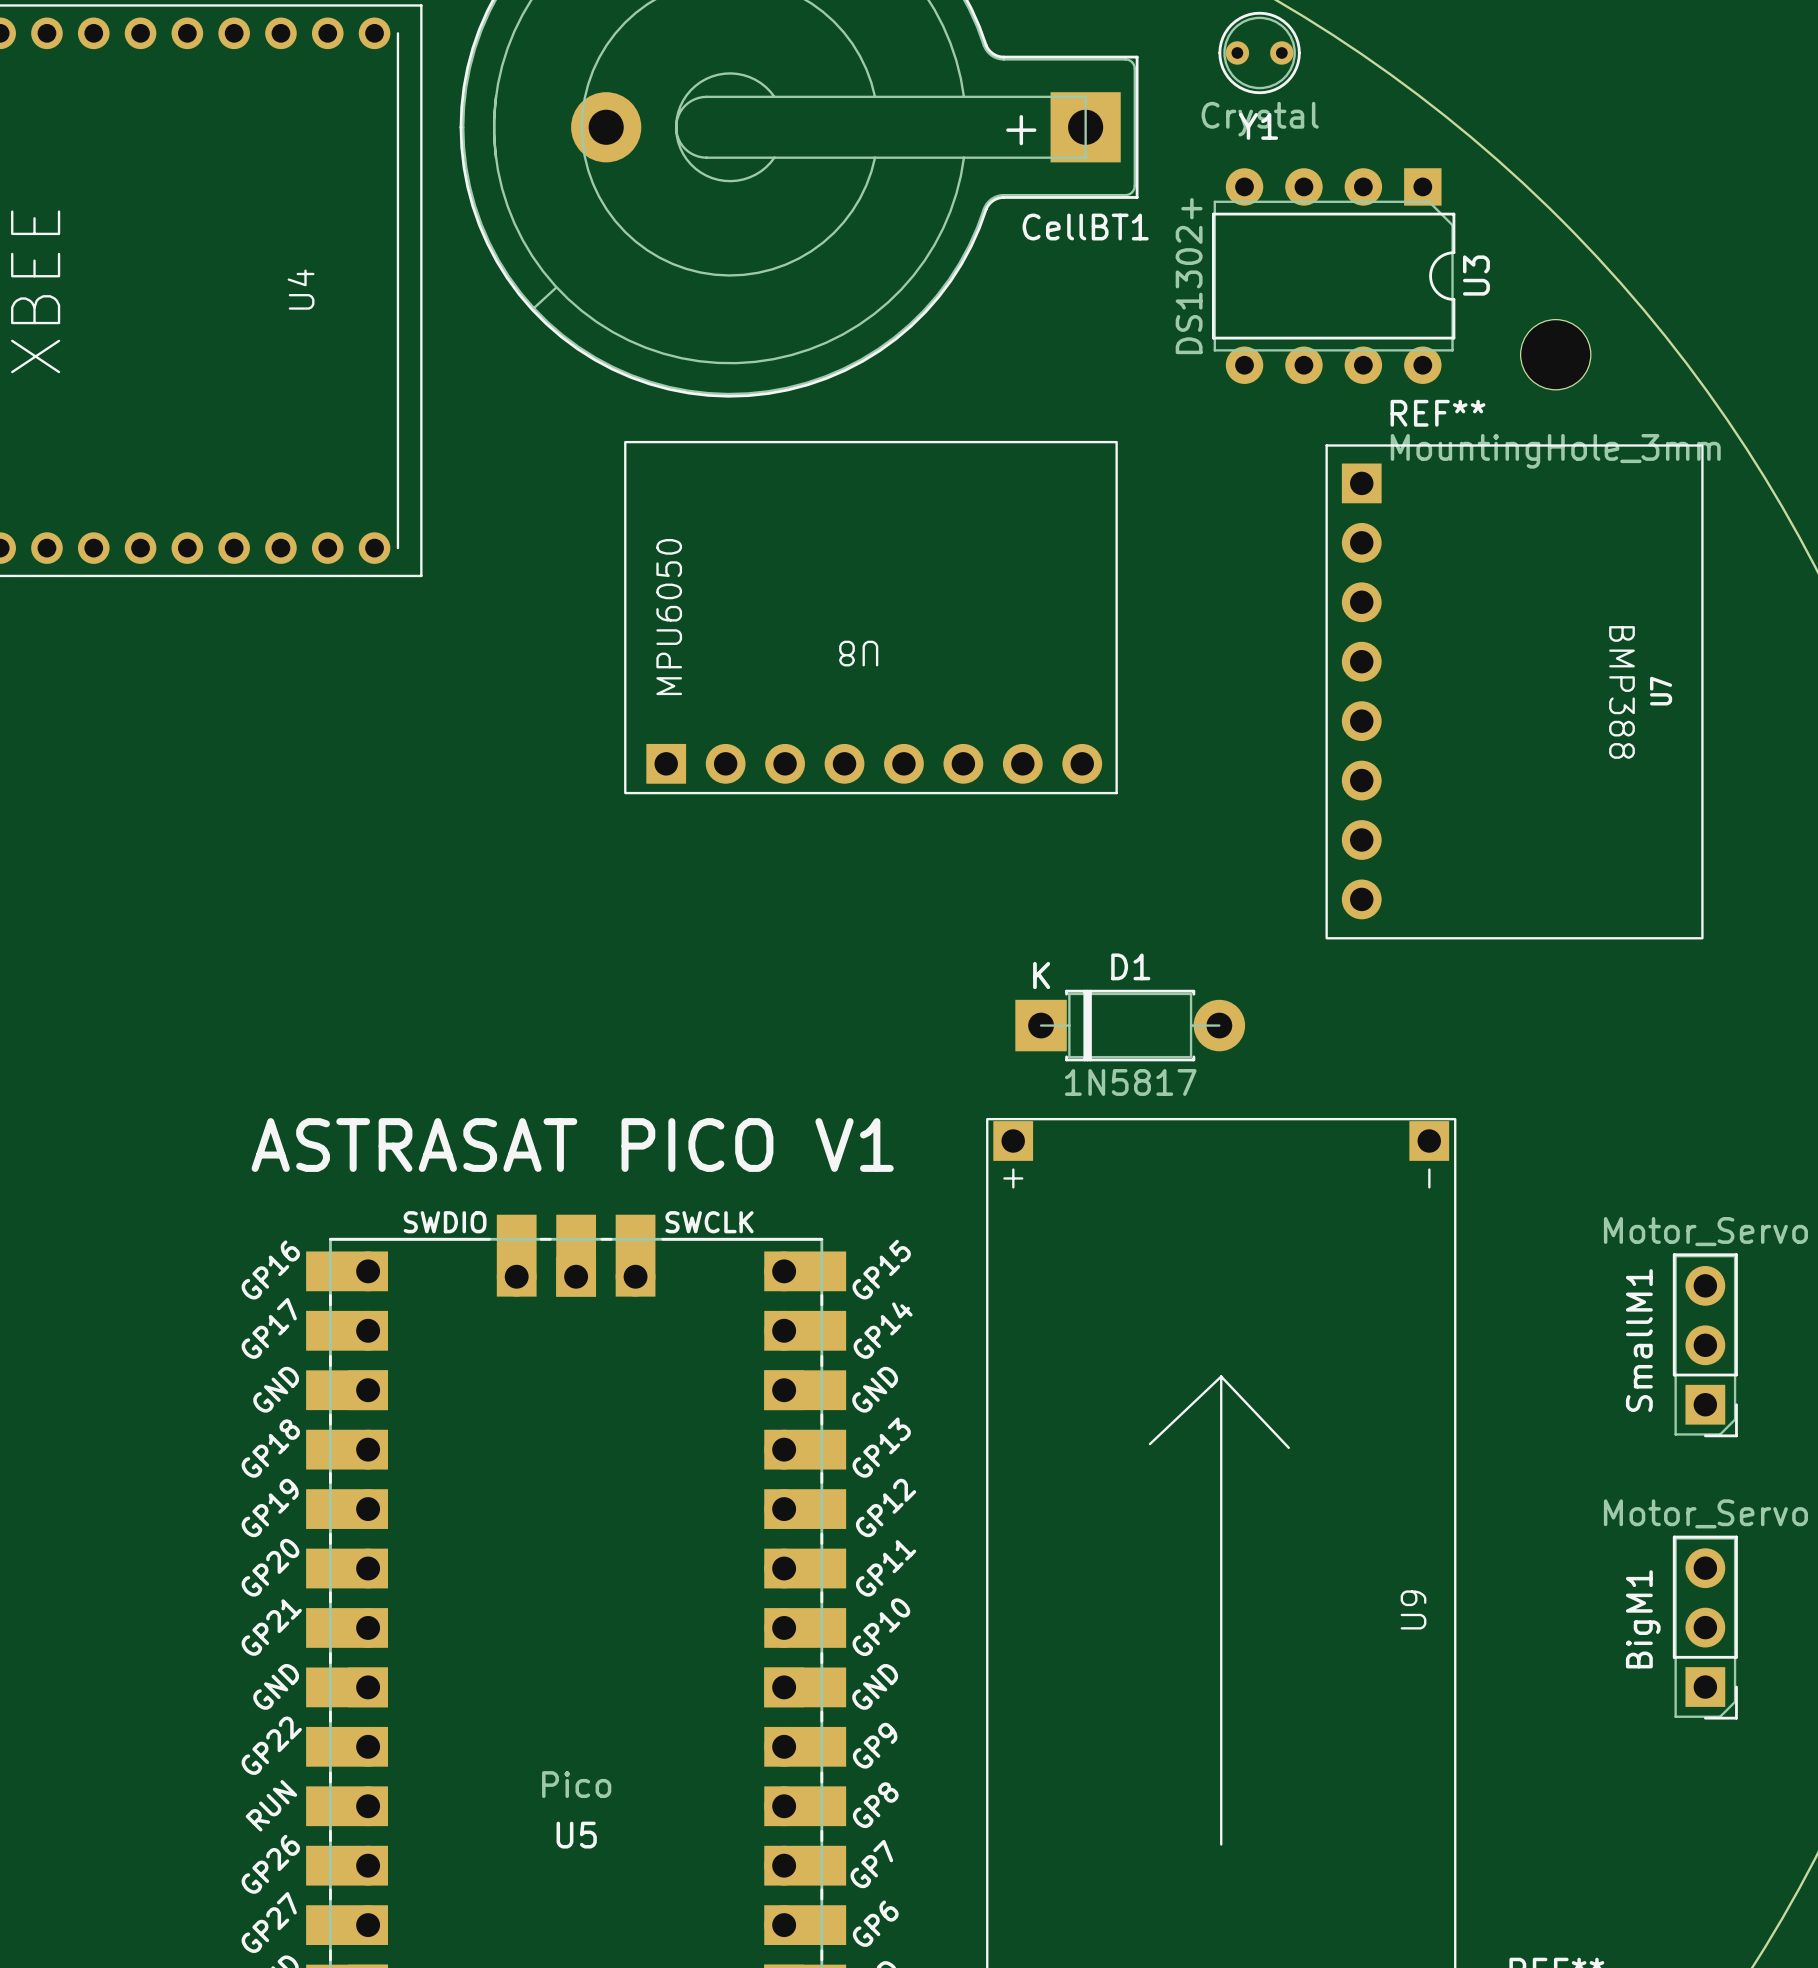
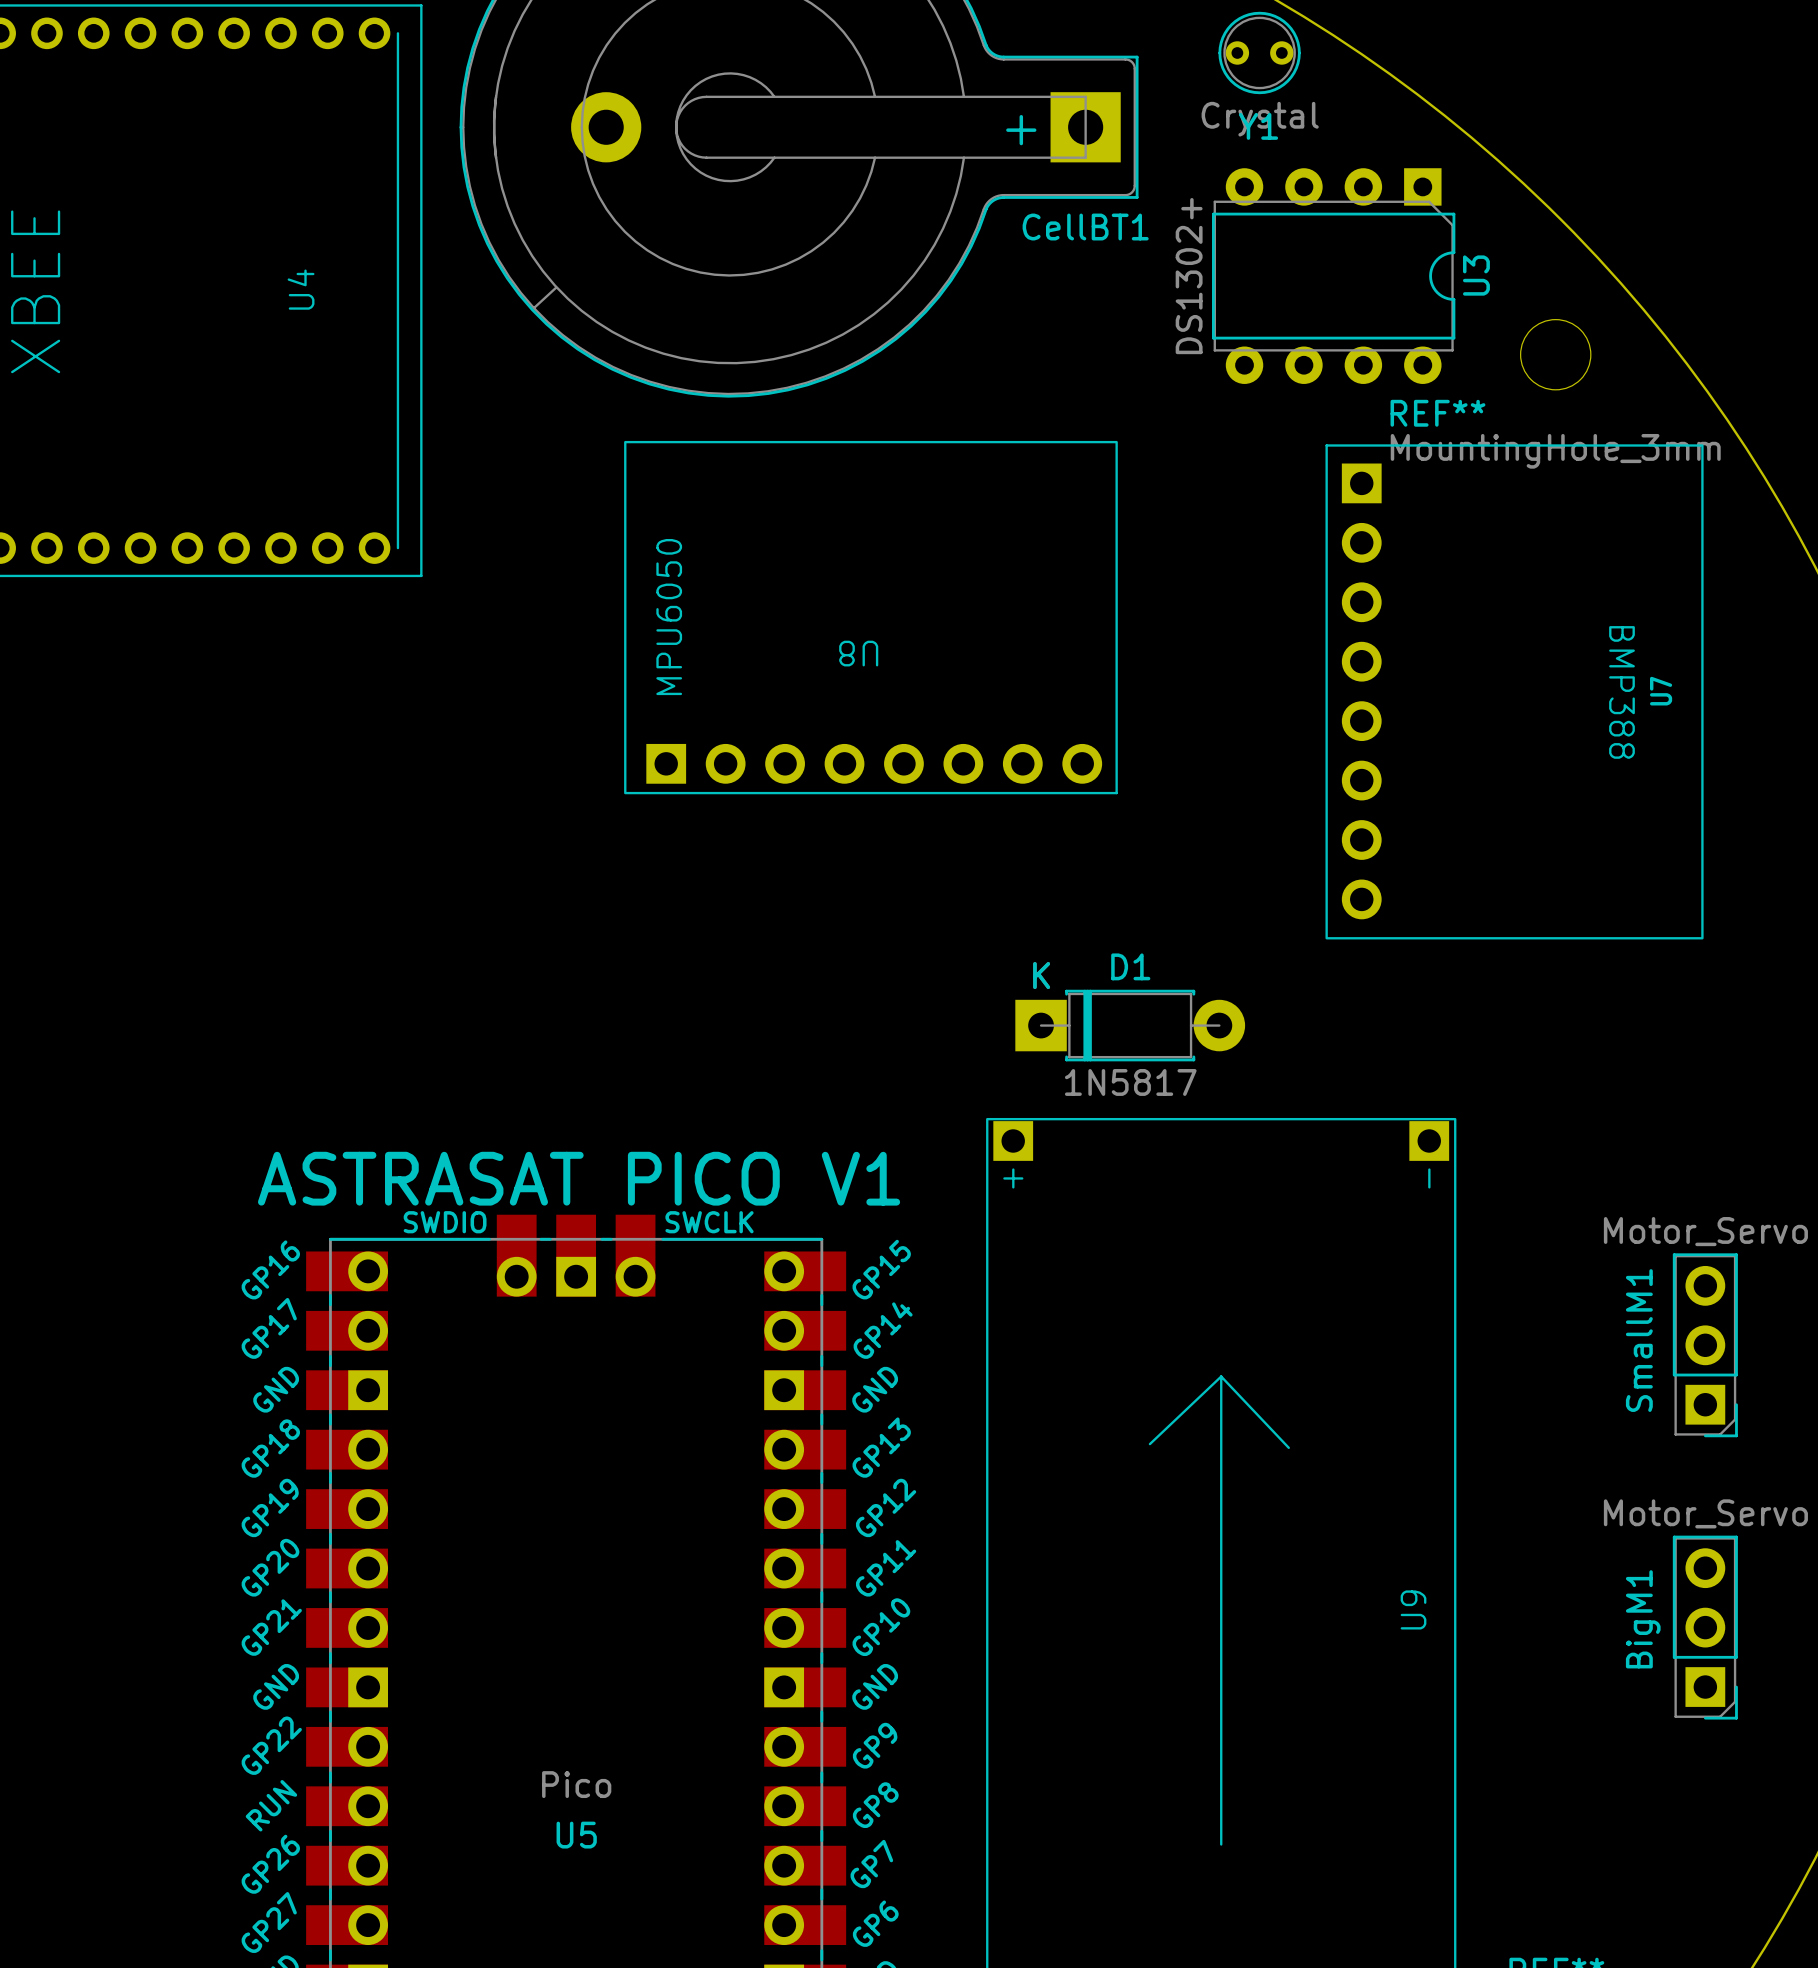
text position: ASTRASAT PICO V1 (572, 1145) -> ASTRASAT PICO V1 (579, 1178)

